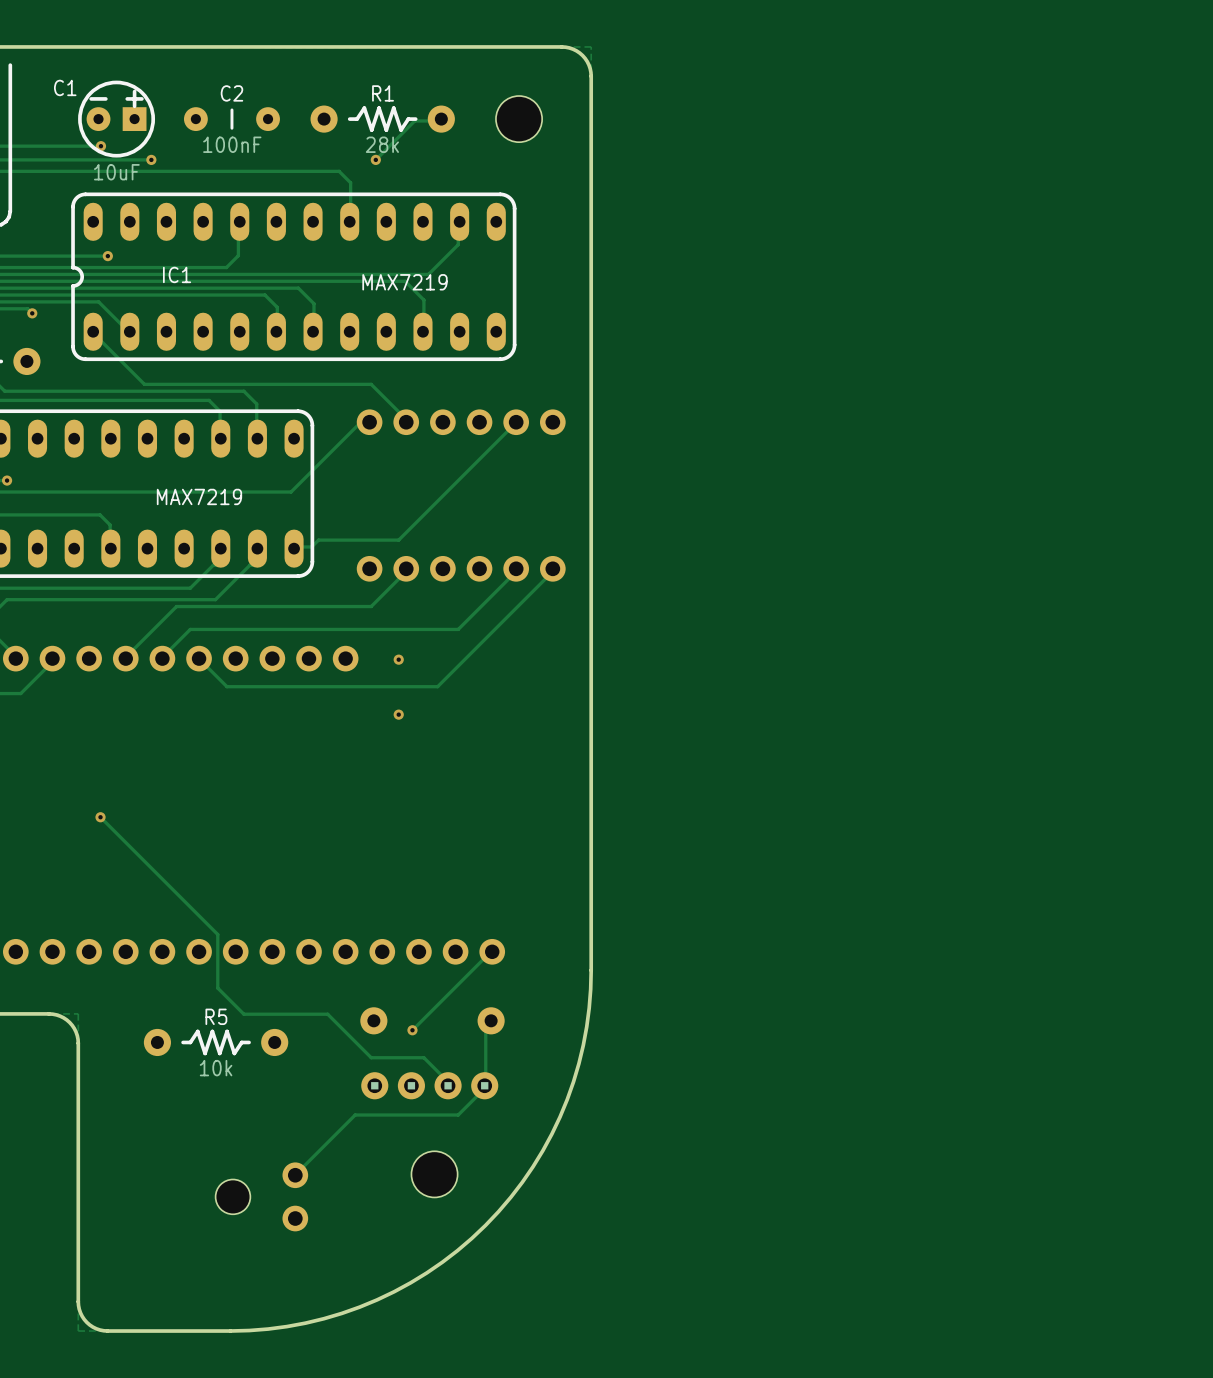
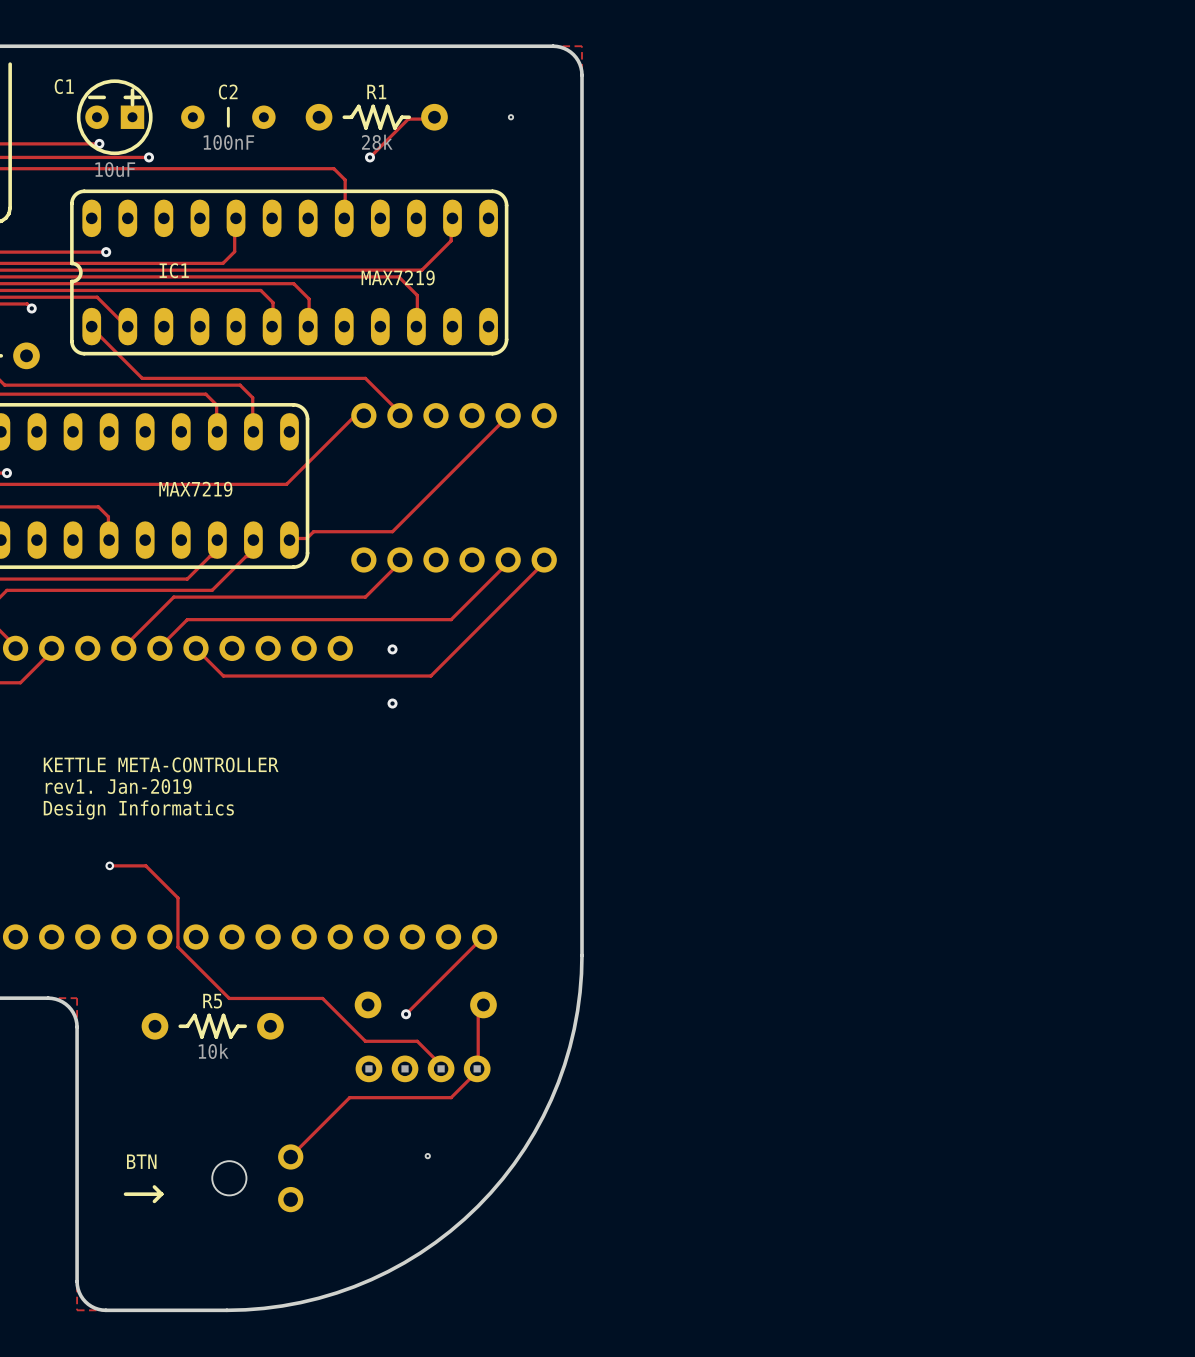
hole size: [495, 96, 543, 143] -> [508, 115, 514, 120]
text: none -> KETTLE META-CONTROLLER (161, 764)
text: none -> rev1. Jan-2019 (118, 786)
track: (100, 817) (217, 934) (217, 988) (243, 1014) -> (109, 865) (145, 865) (177, 897) (177, 947) (229, 998) (240, 998)
via: (100, 817) -> none
text: none -> Design Informatics (138, 809)
via: none -> (109, 865)
hole size: [411, 1151, 458, 1198] -> [425, 1153, 430, 1159]
text: none -> BTN (141, 1161)
line: none -> (154, 1186) (161, 1194)
line: none -> (125, 1194) (161, 1194)
line: none -> (161, 1194) (154, 1201)

